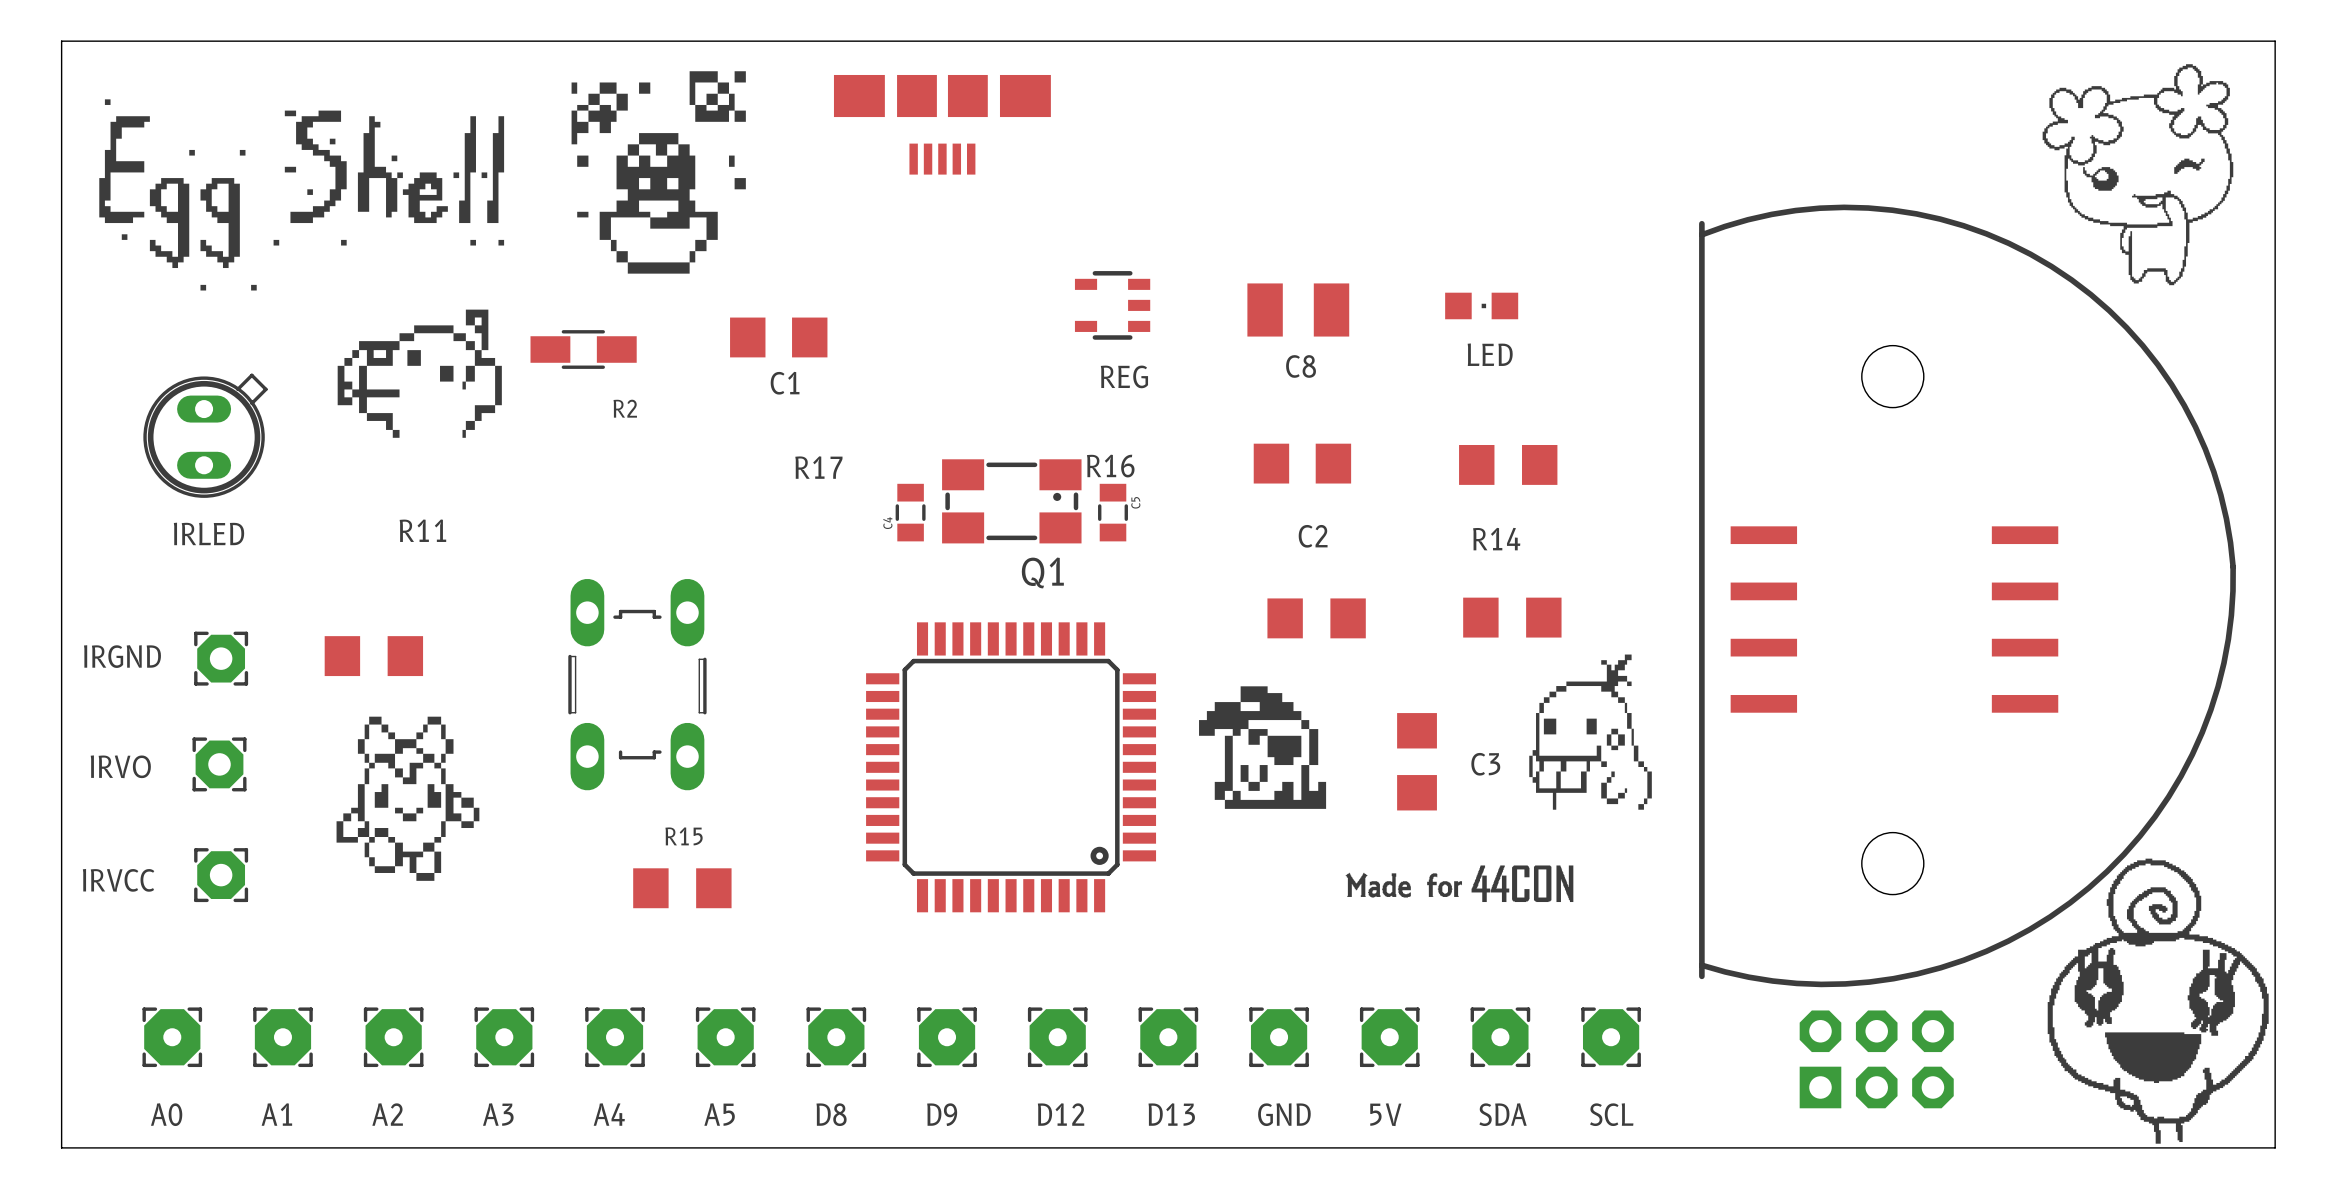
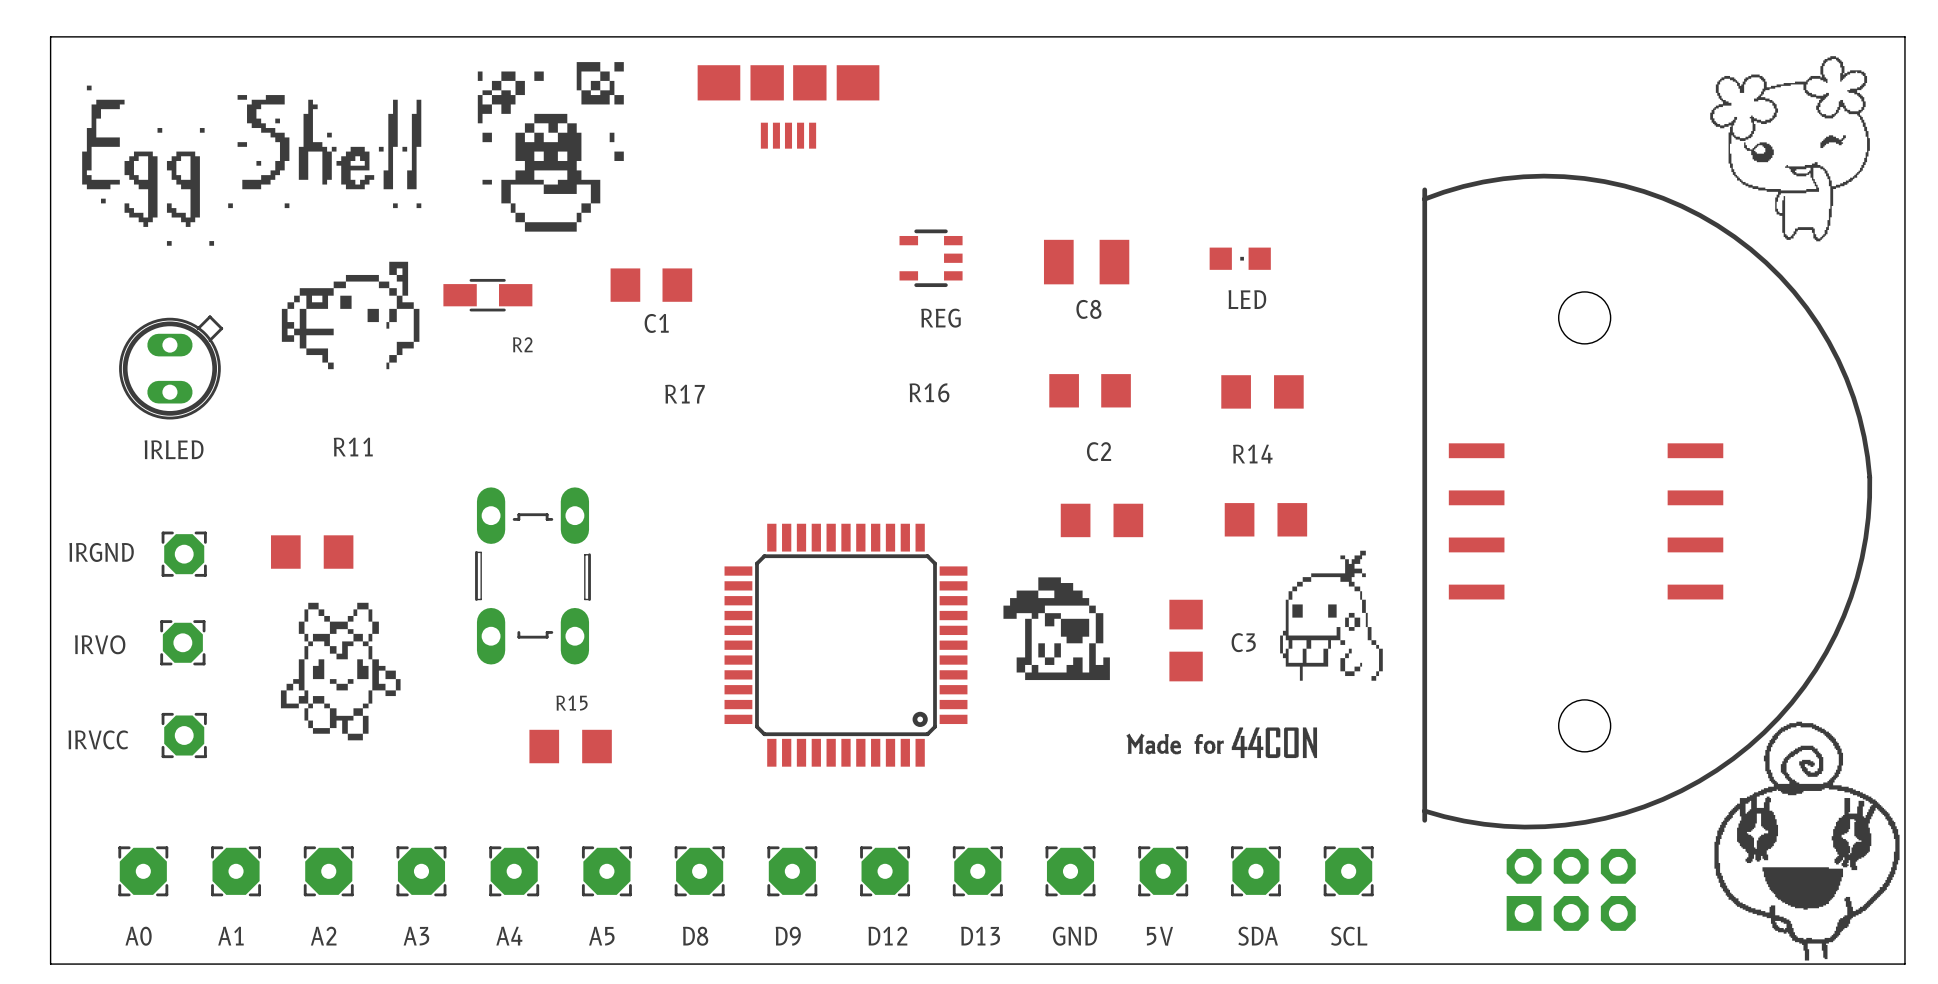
Q1: (1011, 501) -> none
C4: (910, 512) -> none
C5: (1113, 512) -> none

